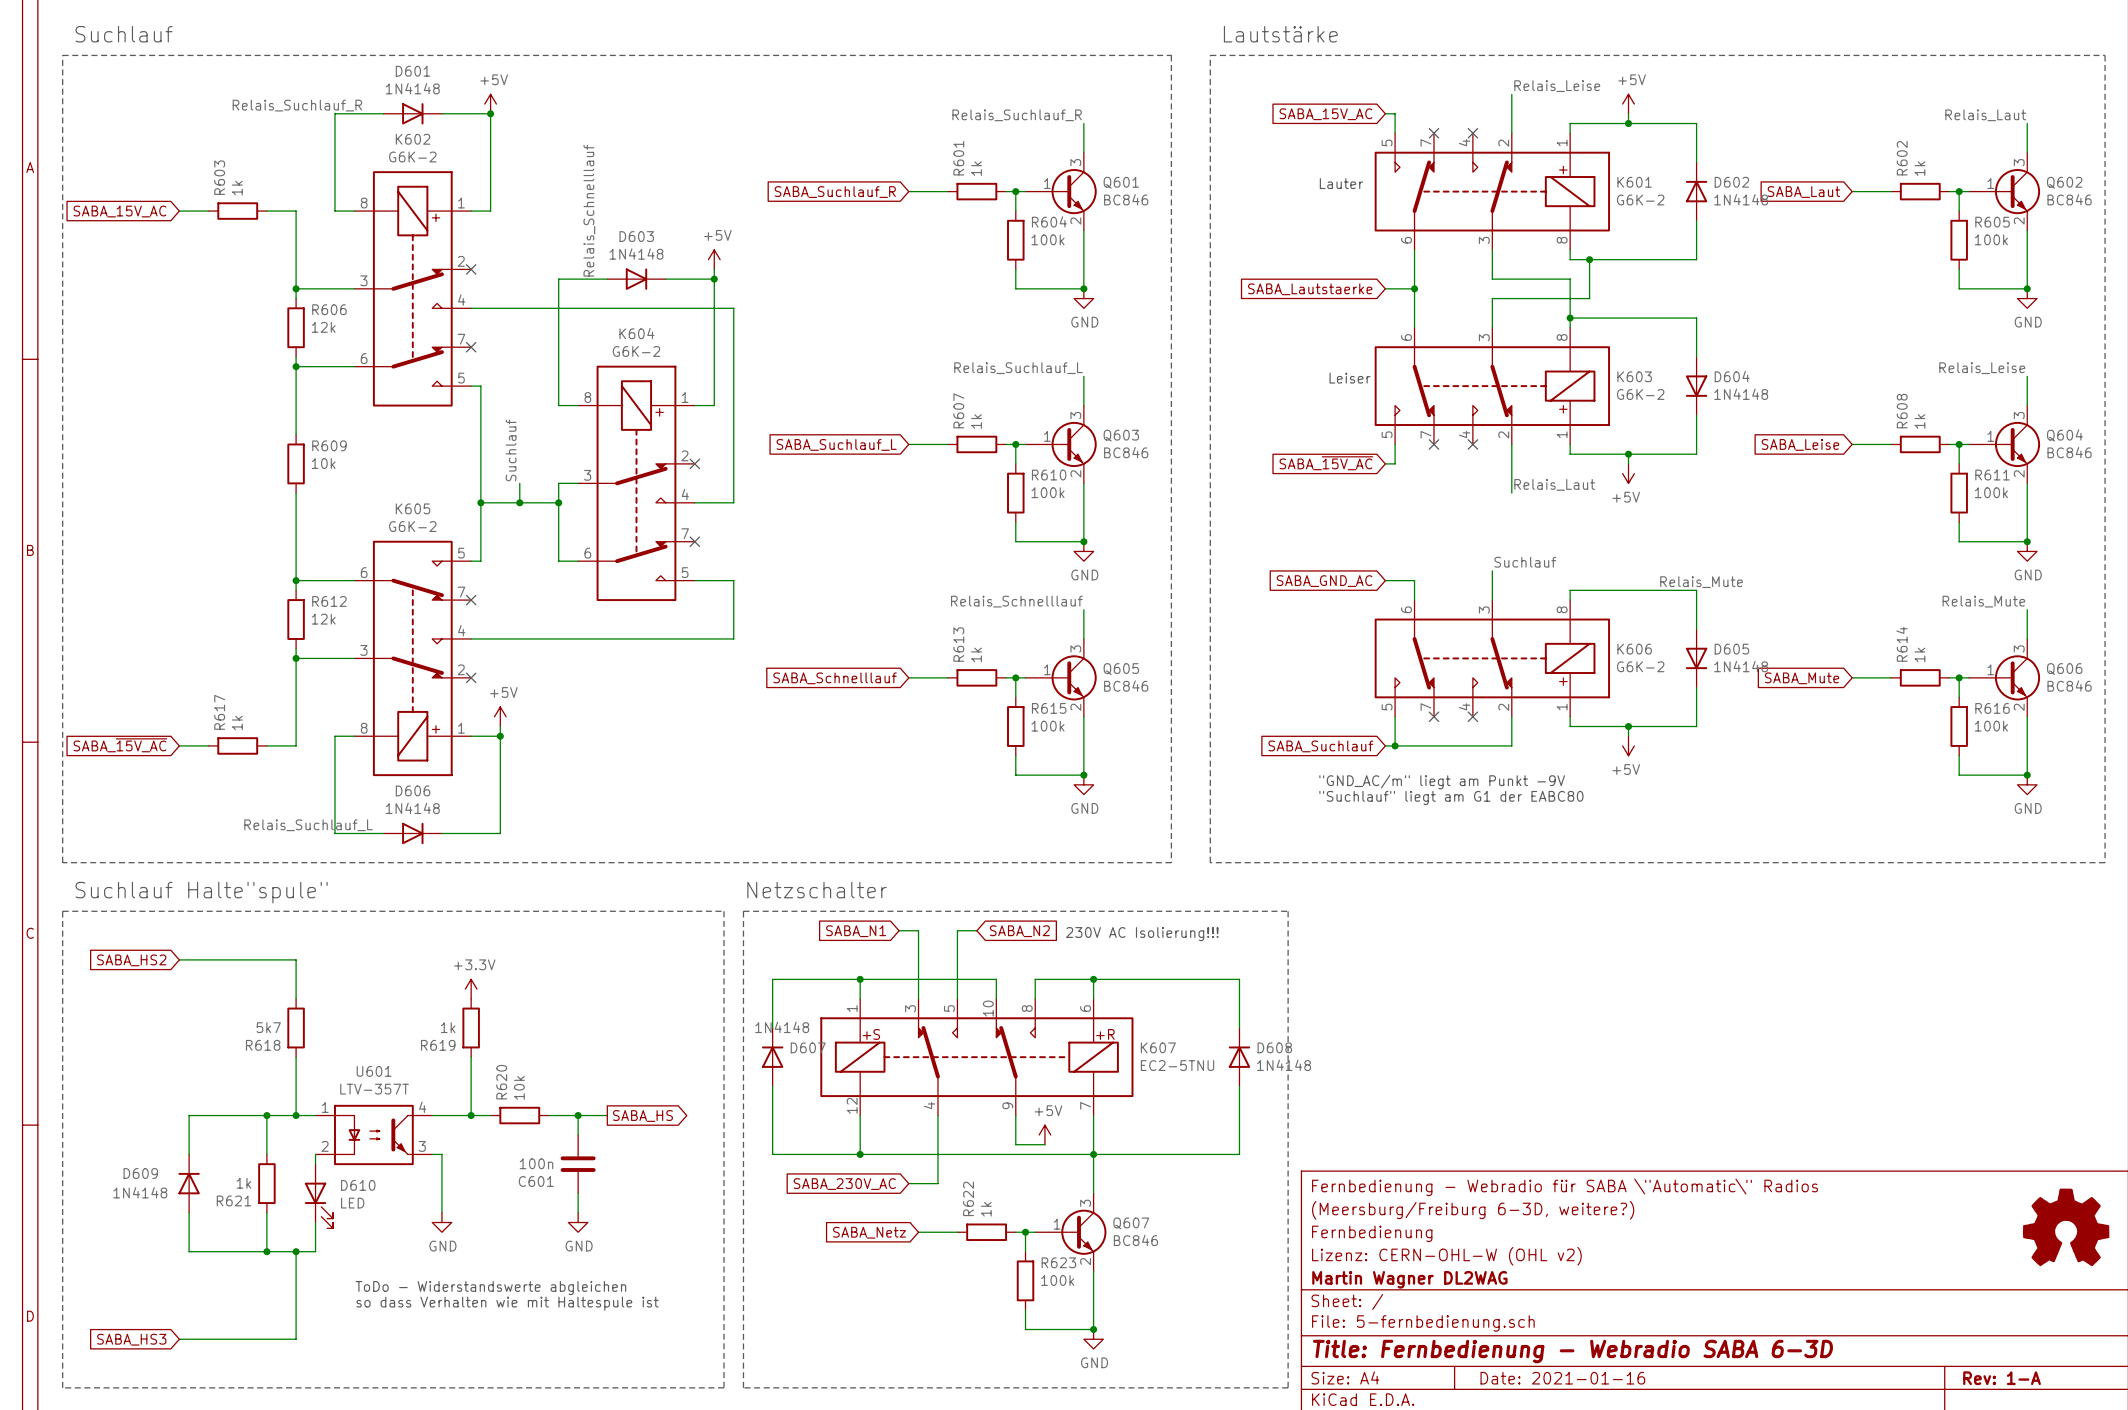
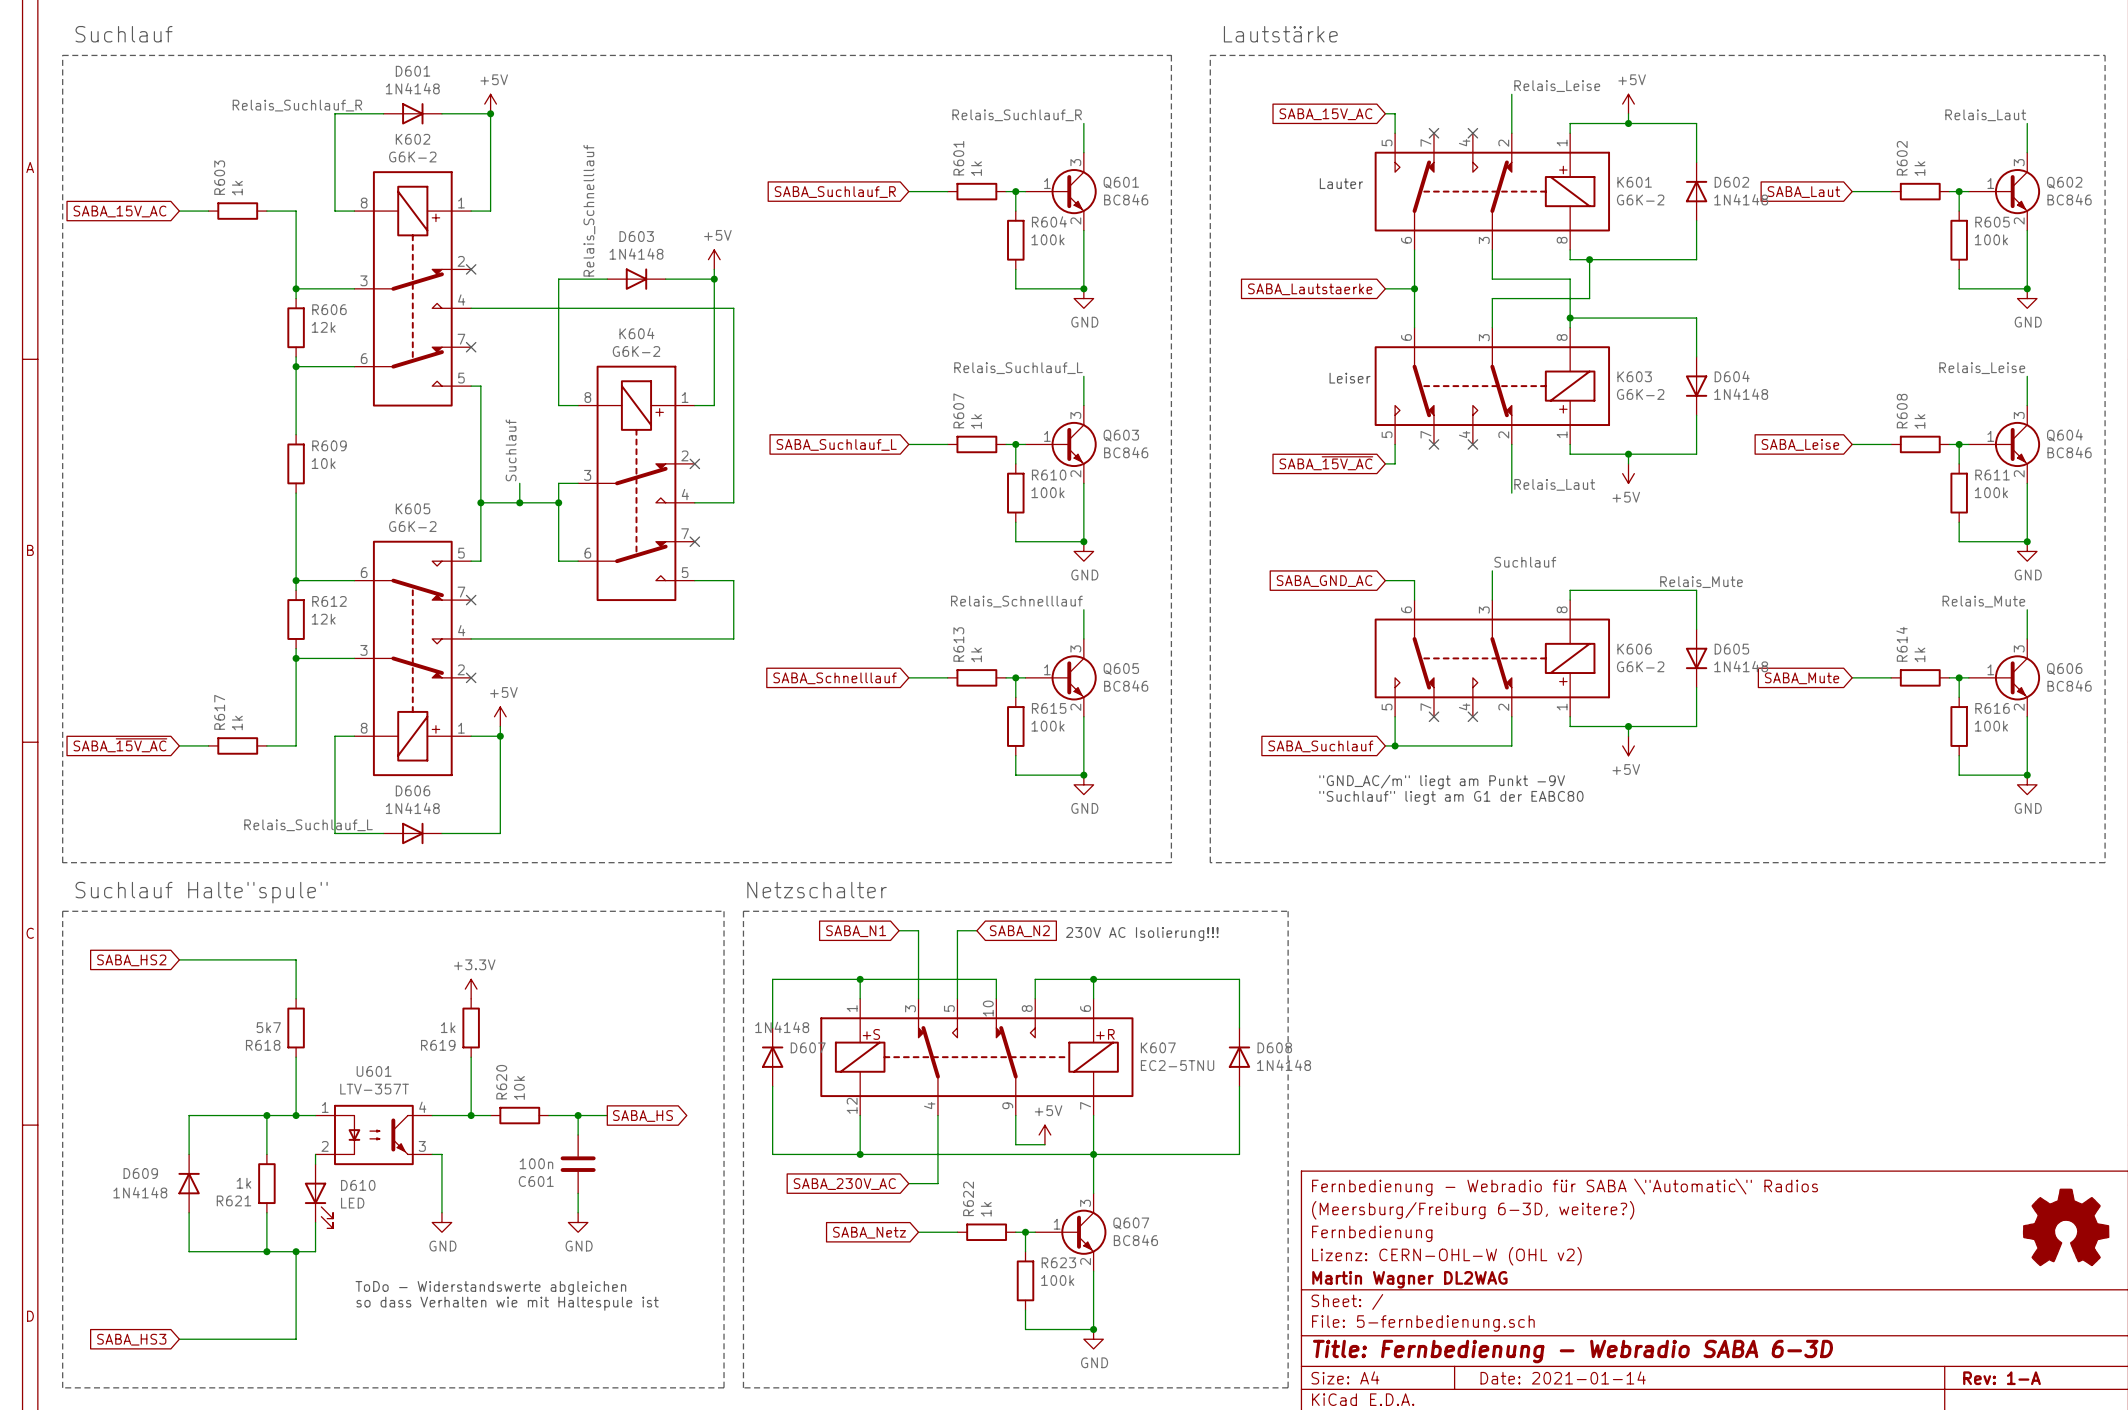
title block: Date: 2021-01-16 (1562, 1378) -> Date: 2021-01-14 (1563, 1377)

